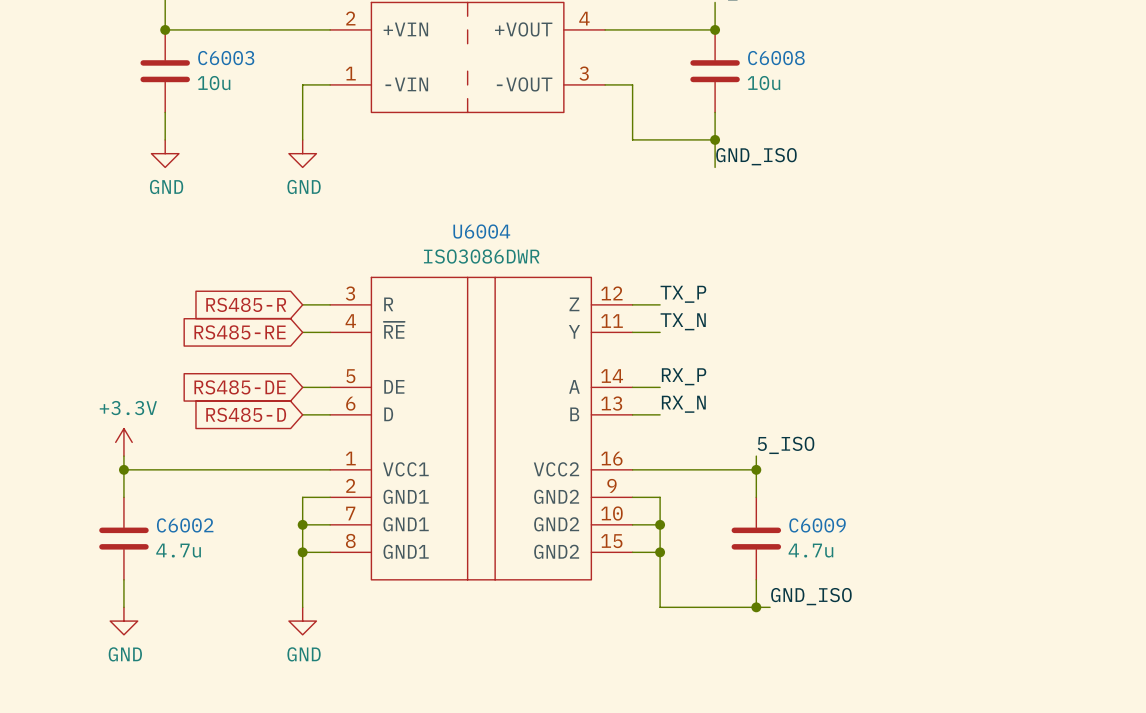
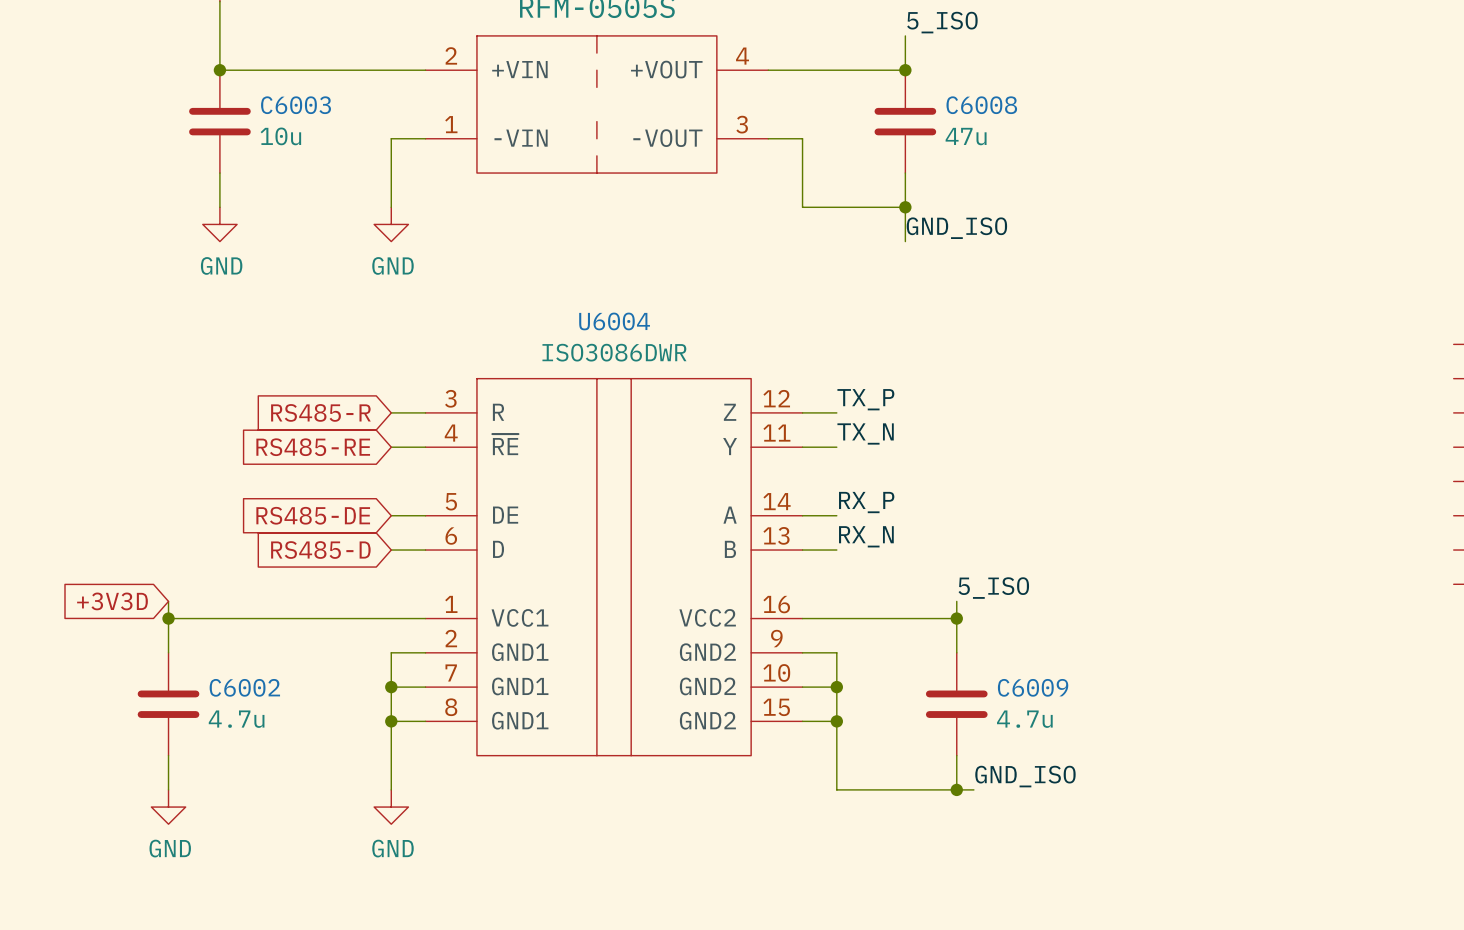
C6008 value: 10u (763, 83) -> 47u (966, 136)
power symbol: +3.3V (123, 442) -> none
global label: none -> +3V3D (112, 601)

